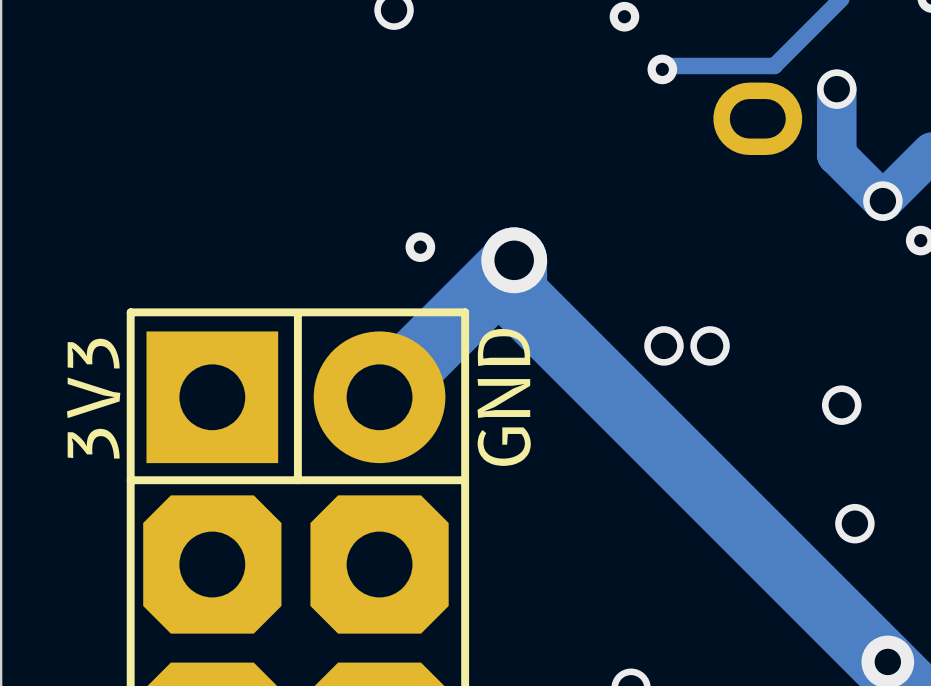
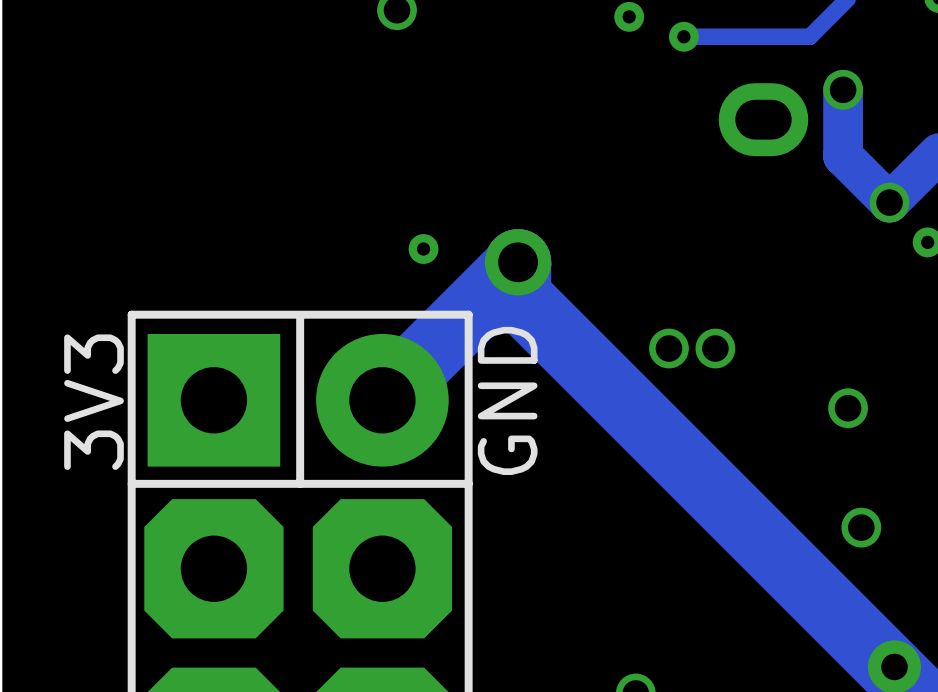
track: (803, 36) (774, 65) (665, 65) (662, 69) -> (809, 36) (683, 36)
via position: (662, 69) -> (683, 36)

